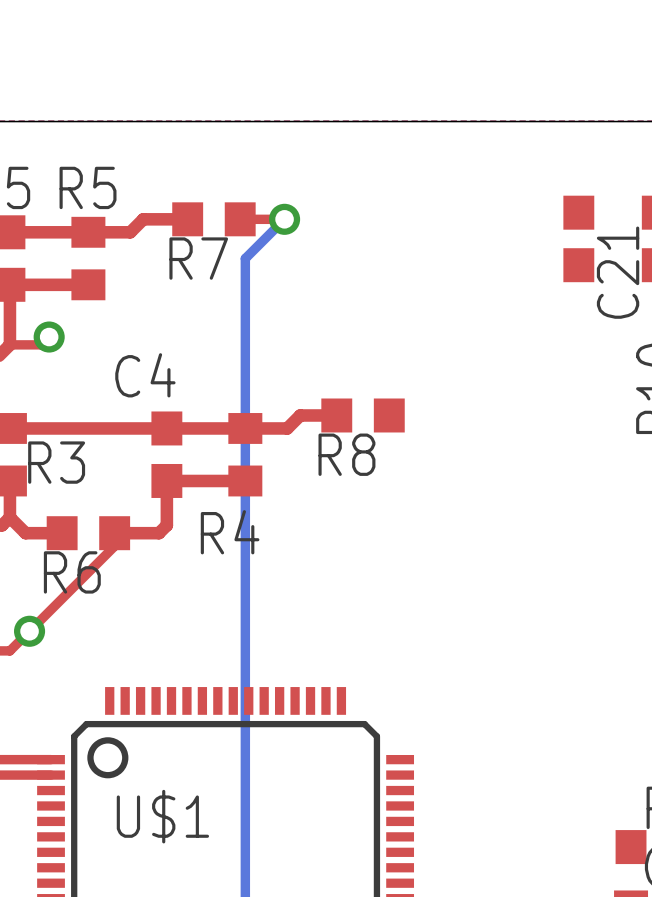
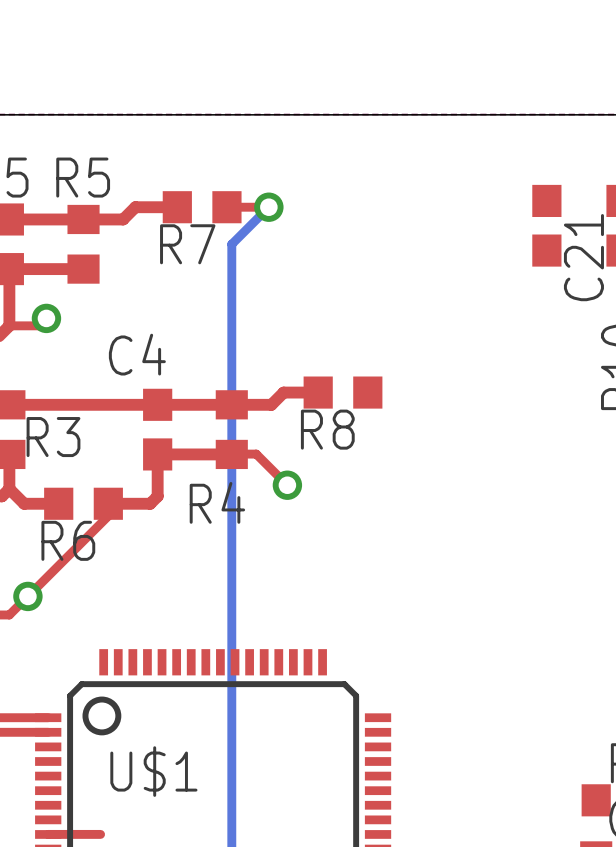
top track: none -> (225, 454) (256, 454) (287, 485)
via: none -> (287, 485)
top track: none -> (48, 834) (100, 834)

